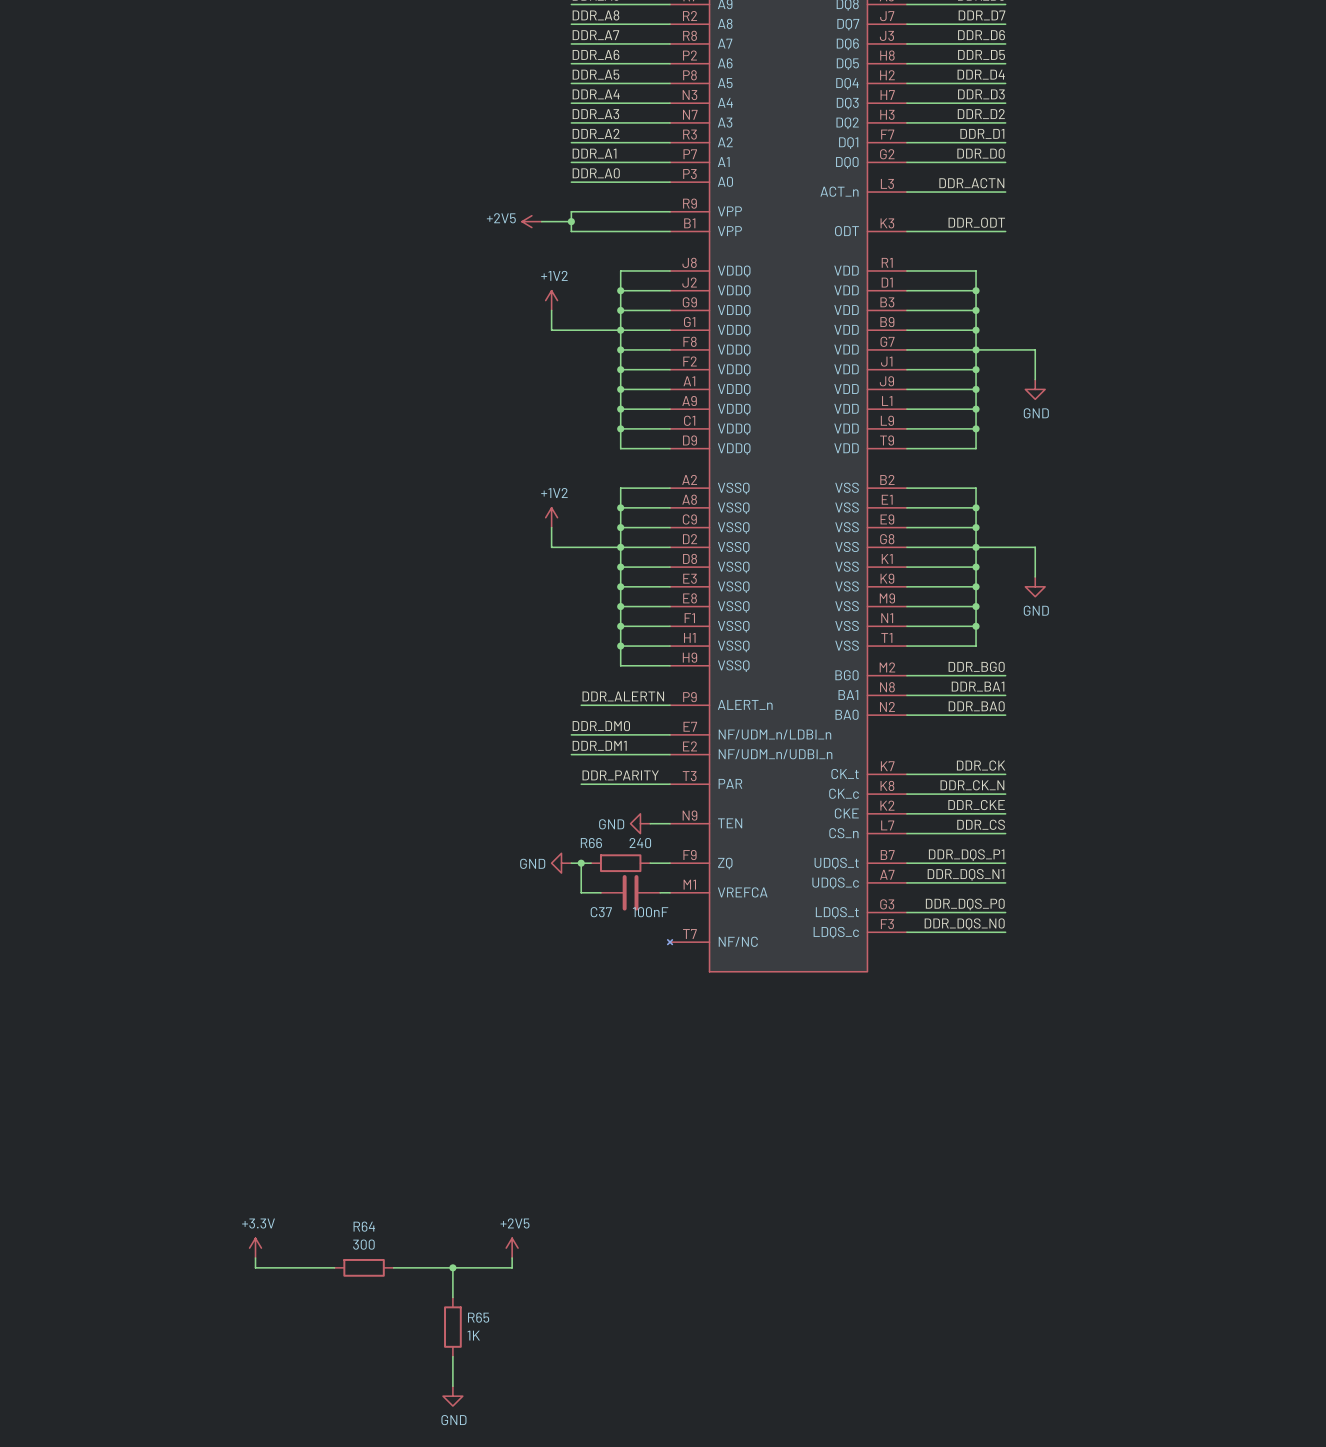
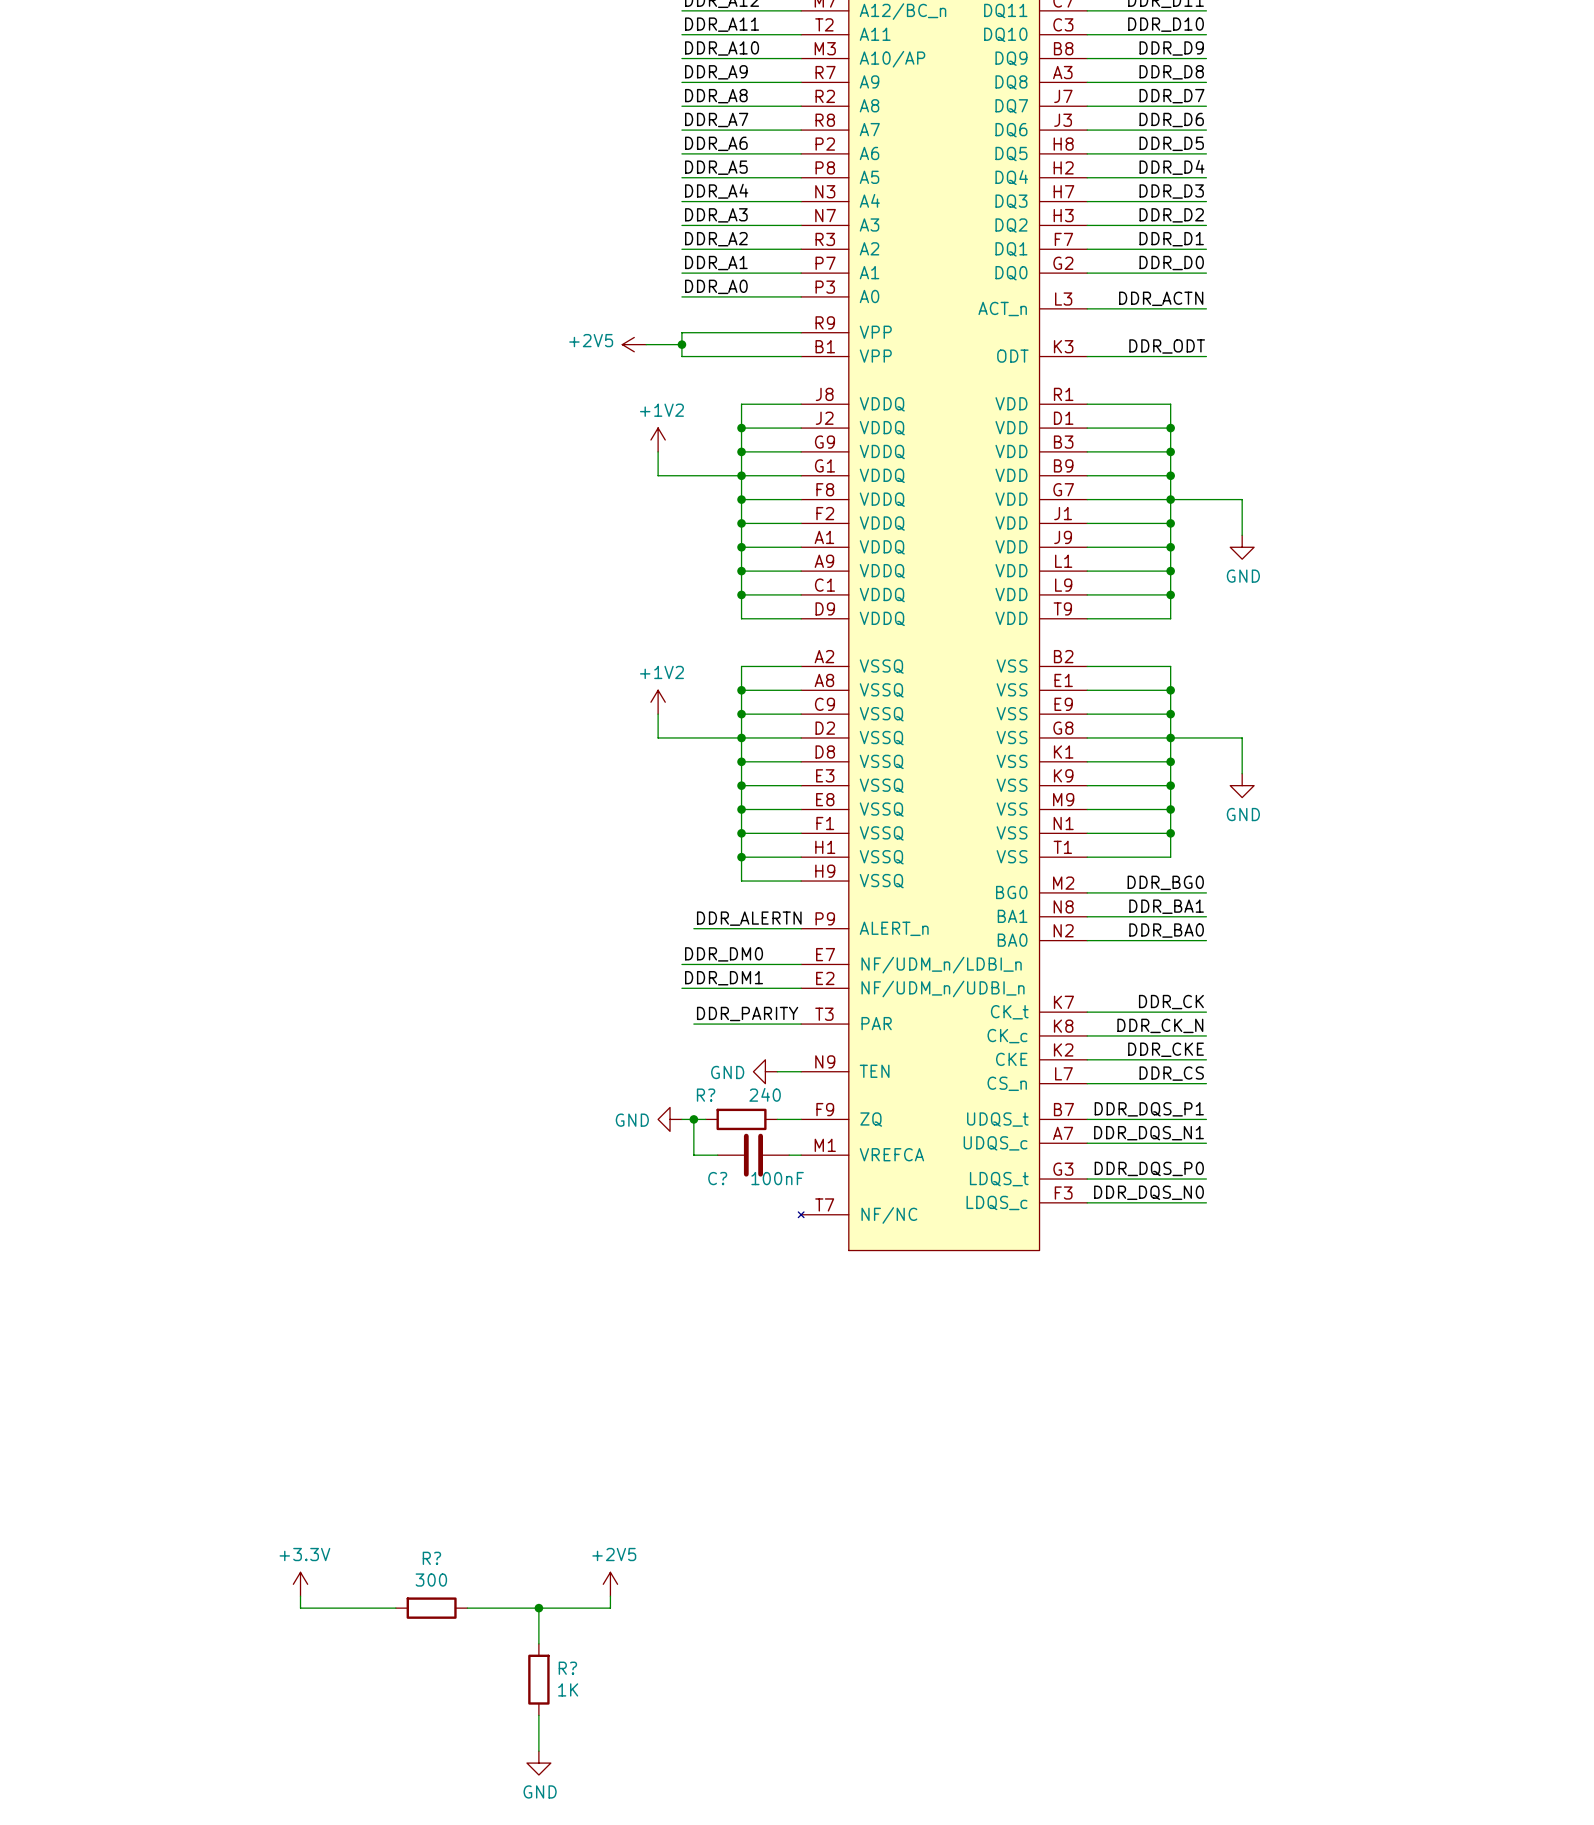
R66 name: R66 (591, 843) -> R? (706, 1095)
C37 name: C37 (601, 912) -> C? (717, 1178)
R64 name: R64 (364, 1226) -> R? (431, 1558)
R65 name: R65 (478, 1317) -> R? (567, 1668)

